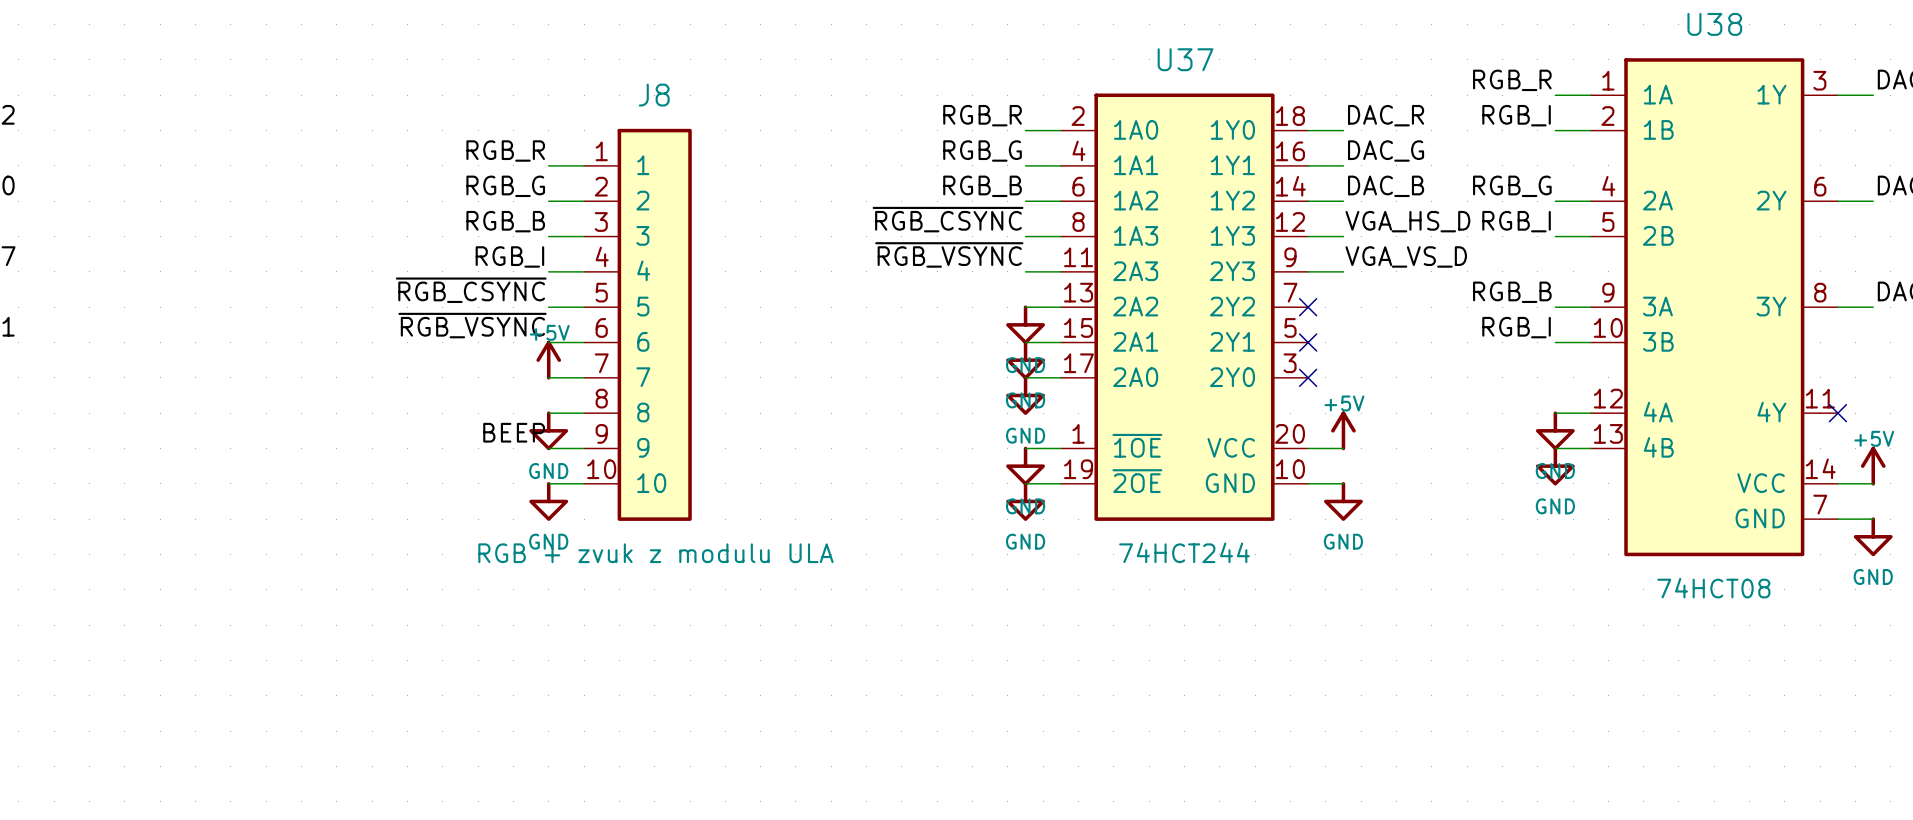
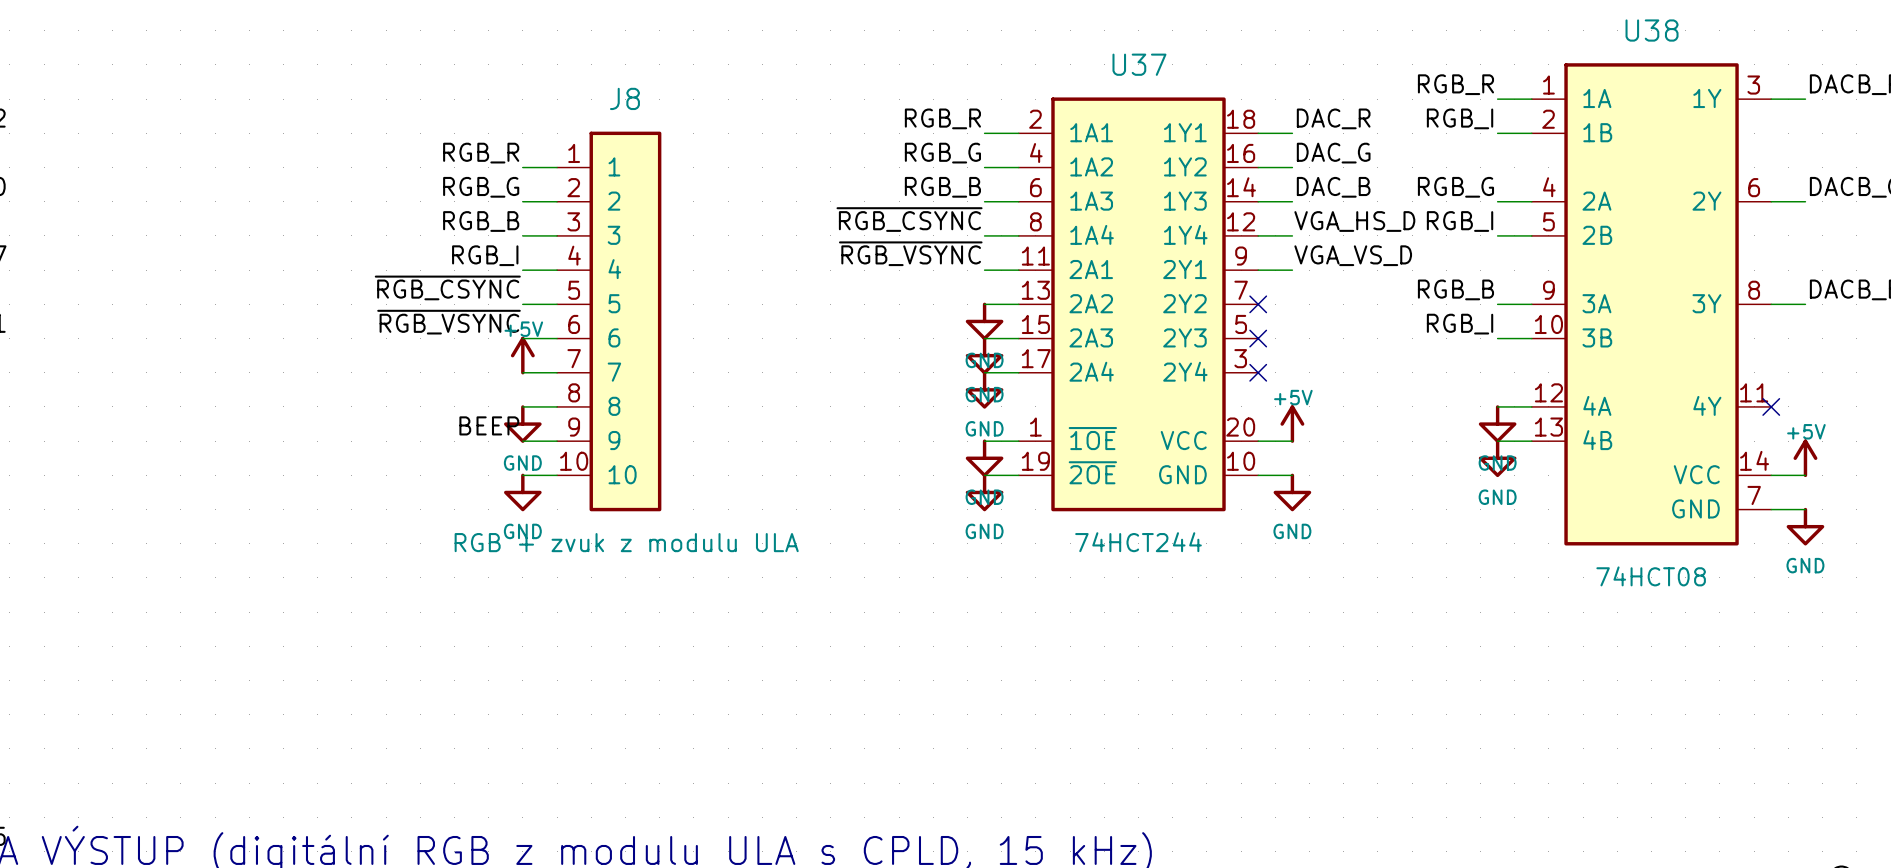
U37 symbol: [1060, 93, 1309, 521] -> [1018, 97, 1259, 512]

